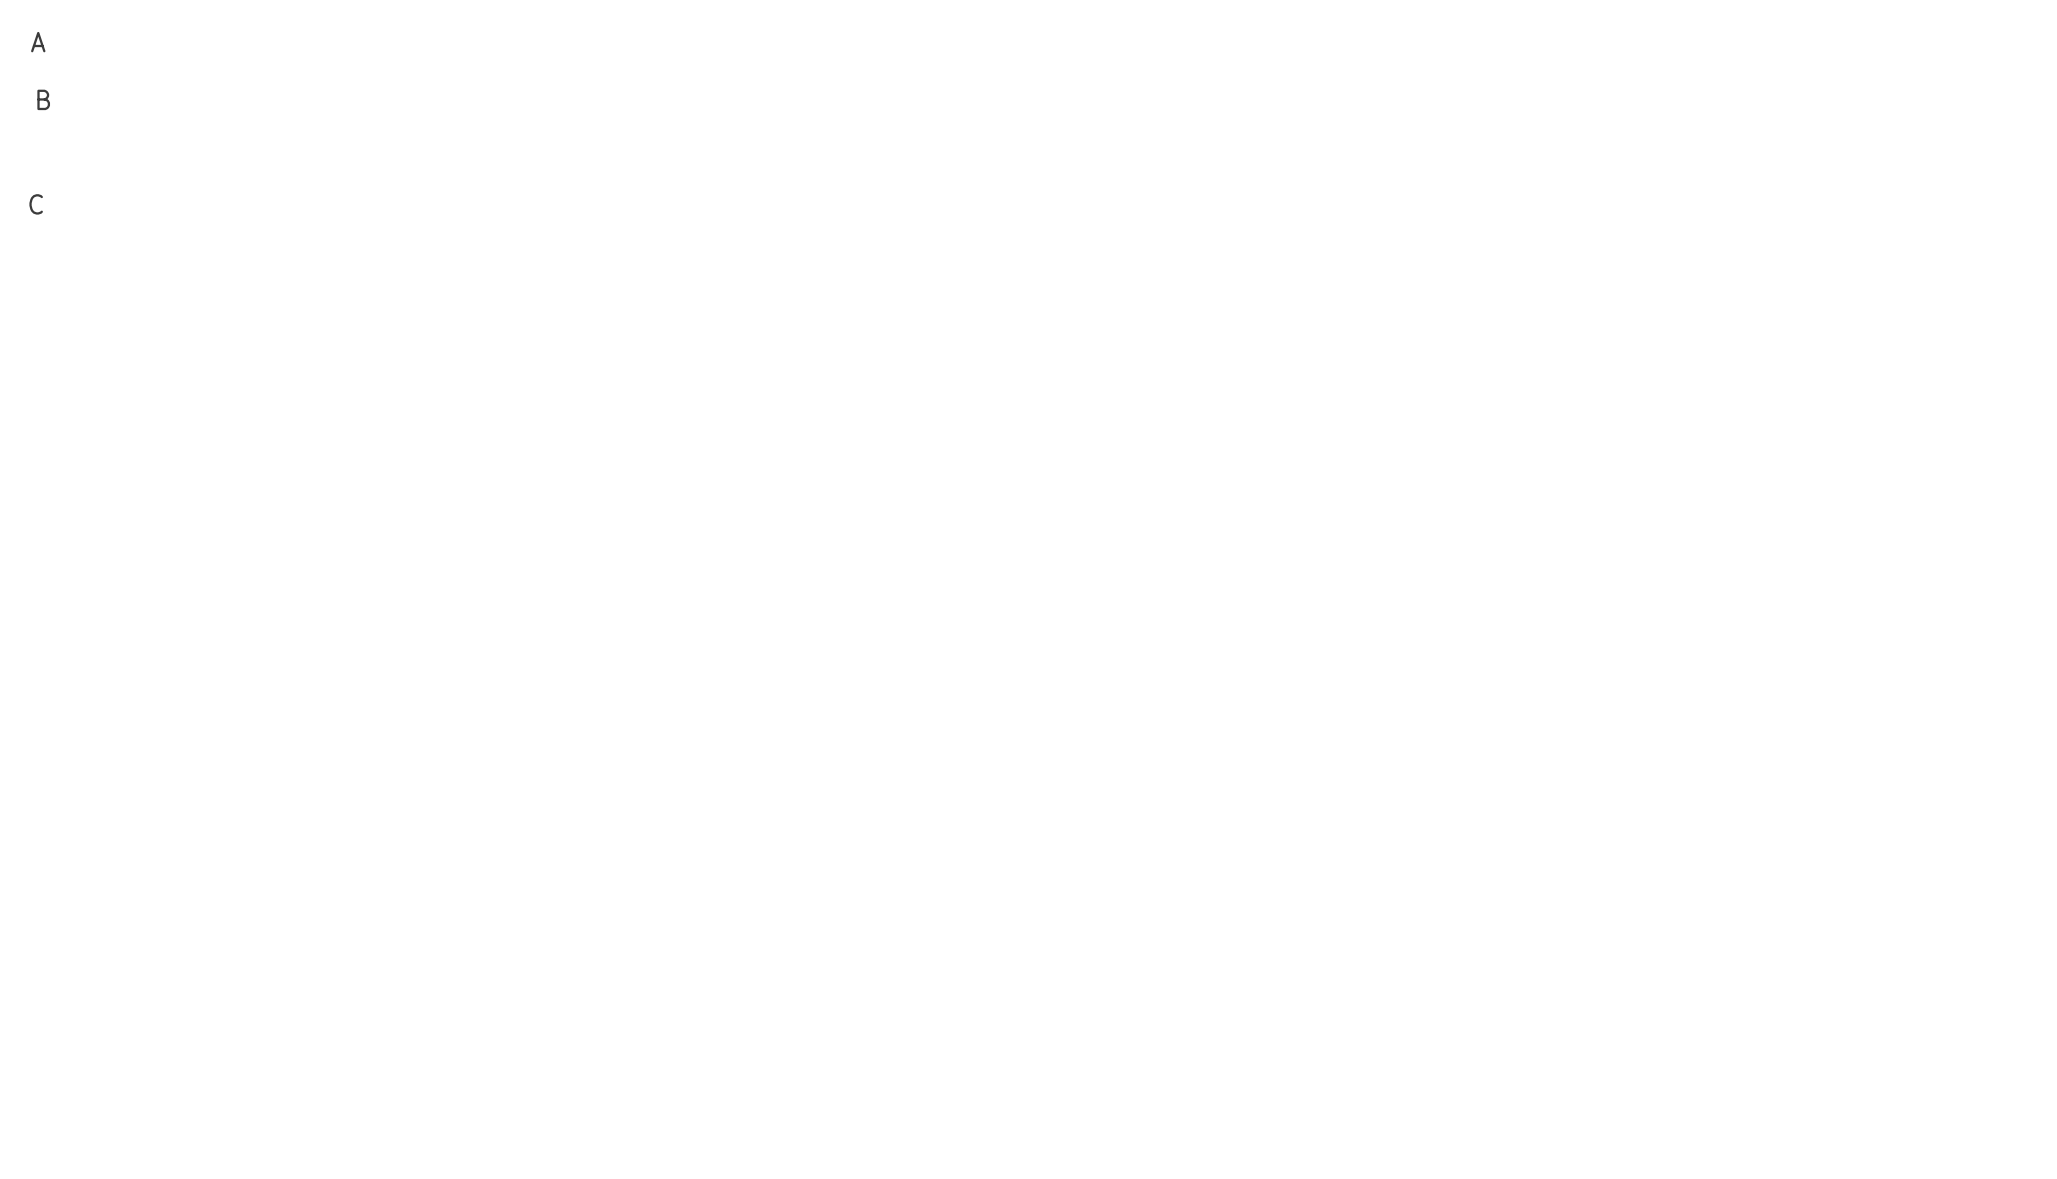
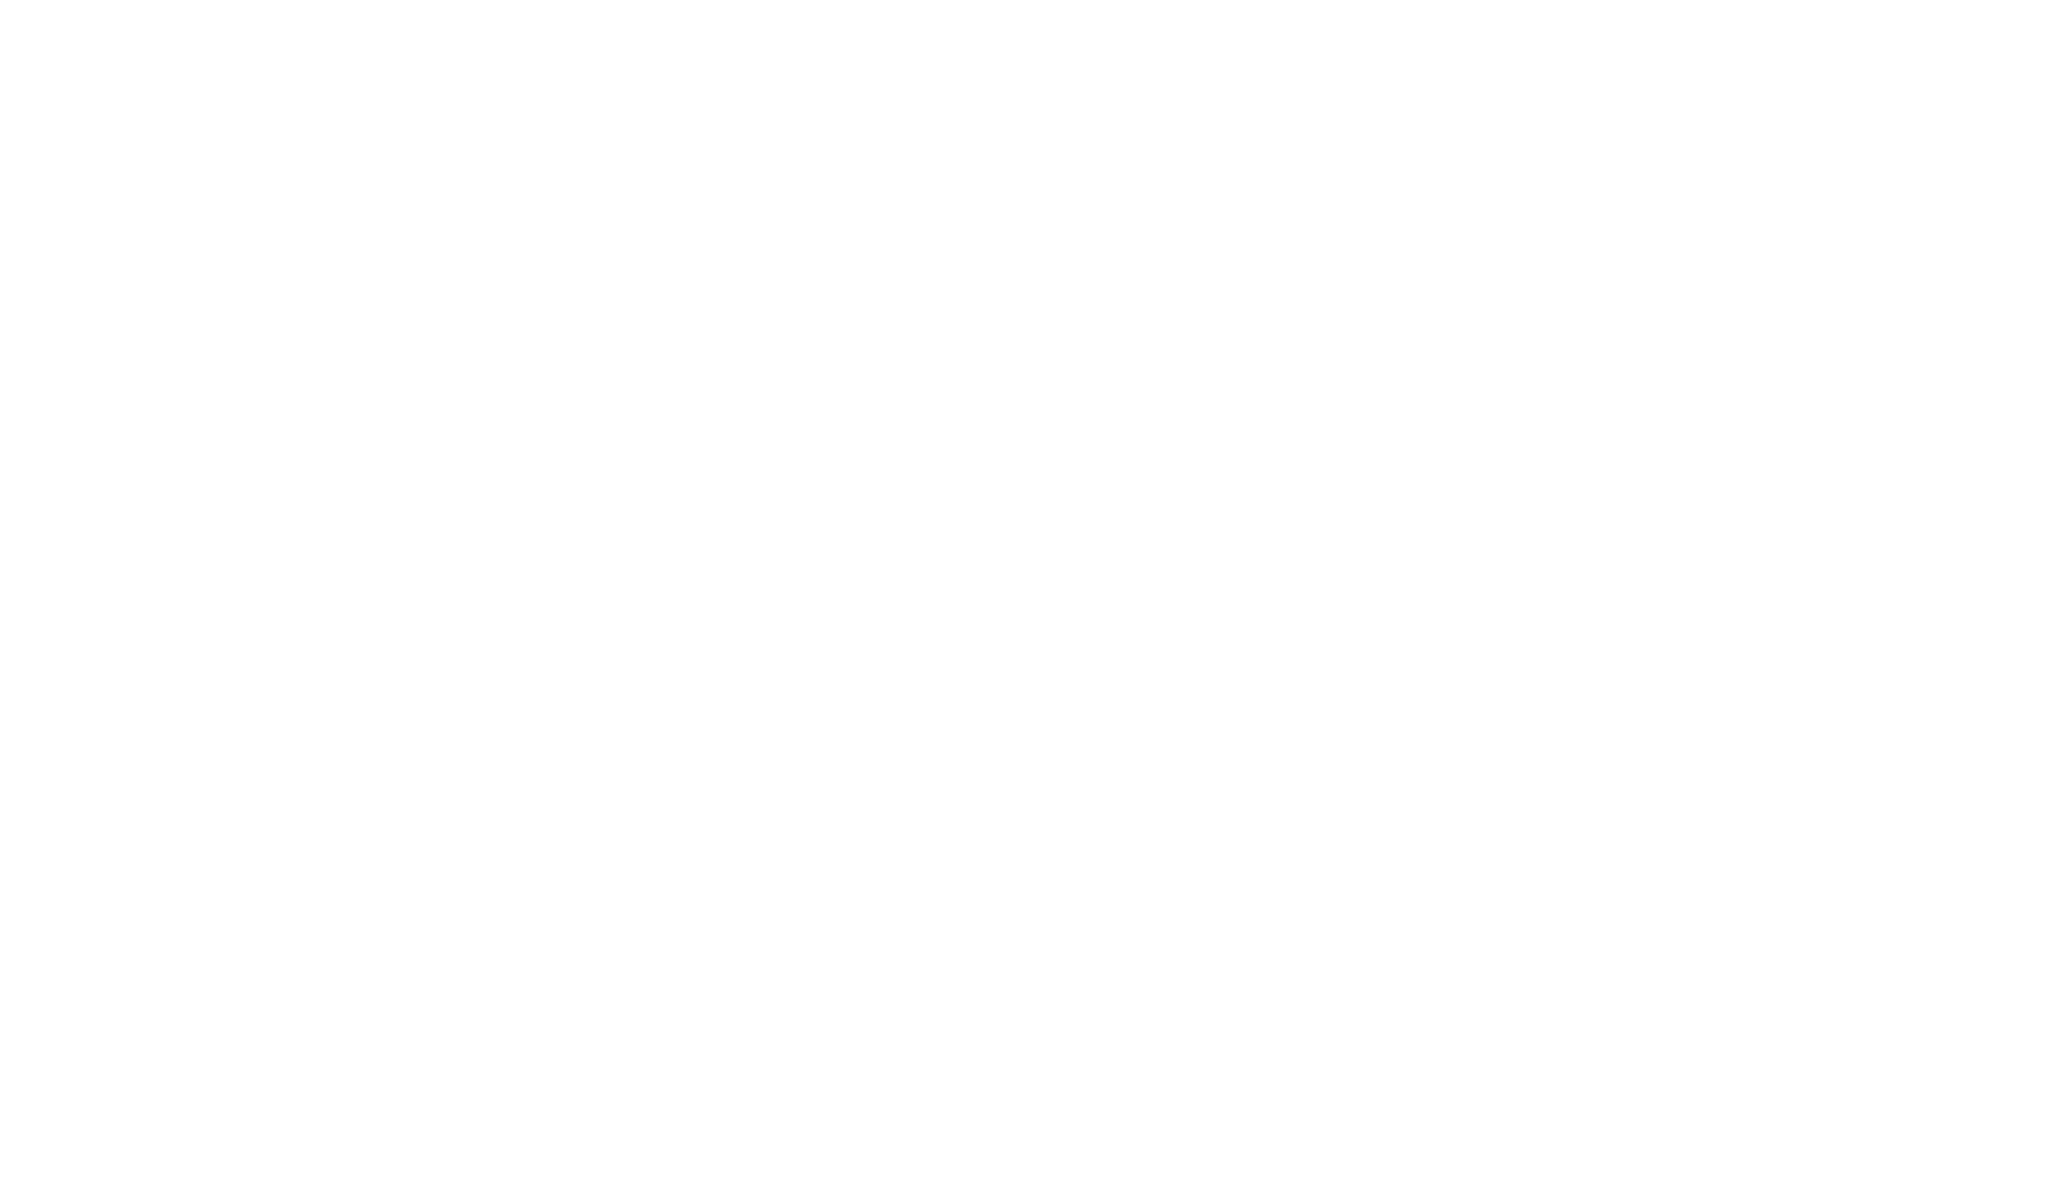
text: A (38, 42) -> none
text: B (43, 99) -> none
text: C (36, 204) -> none

